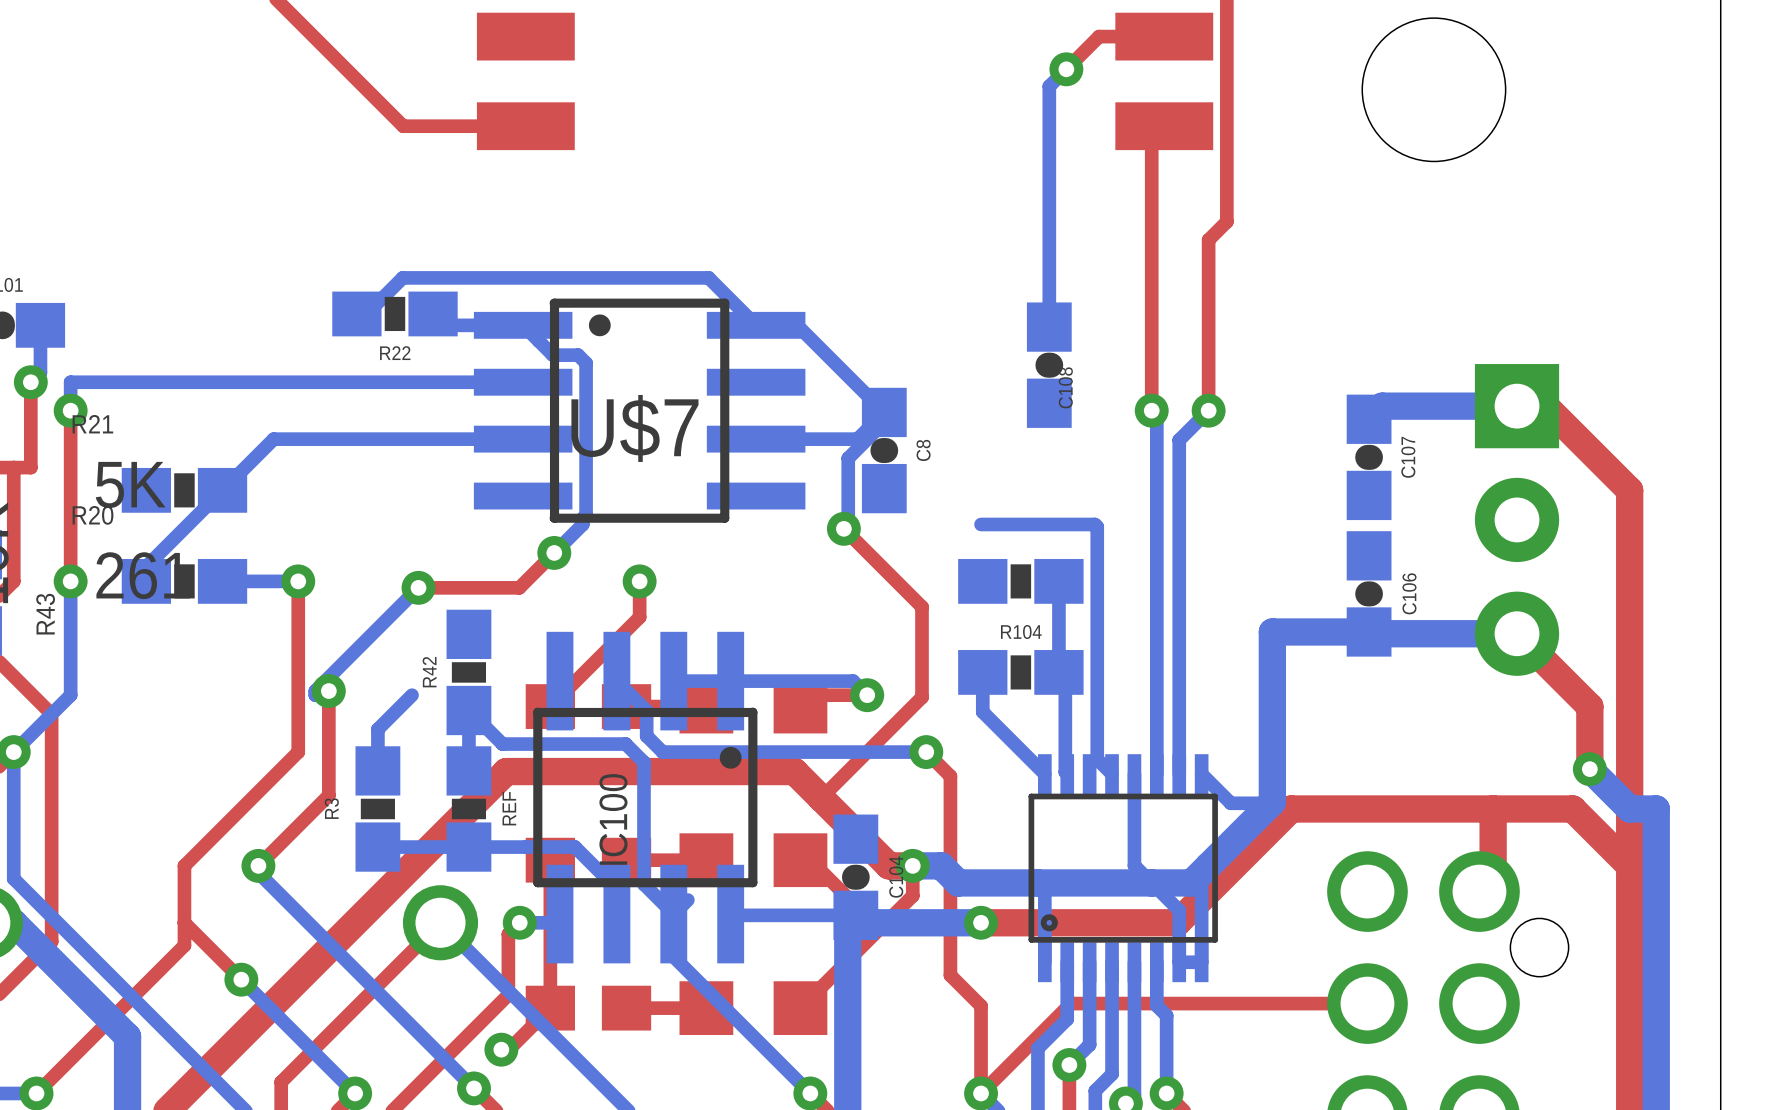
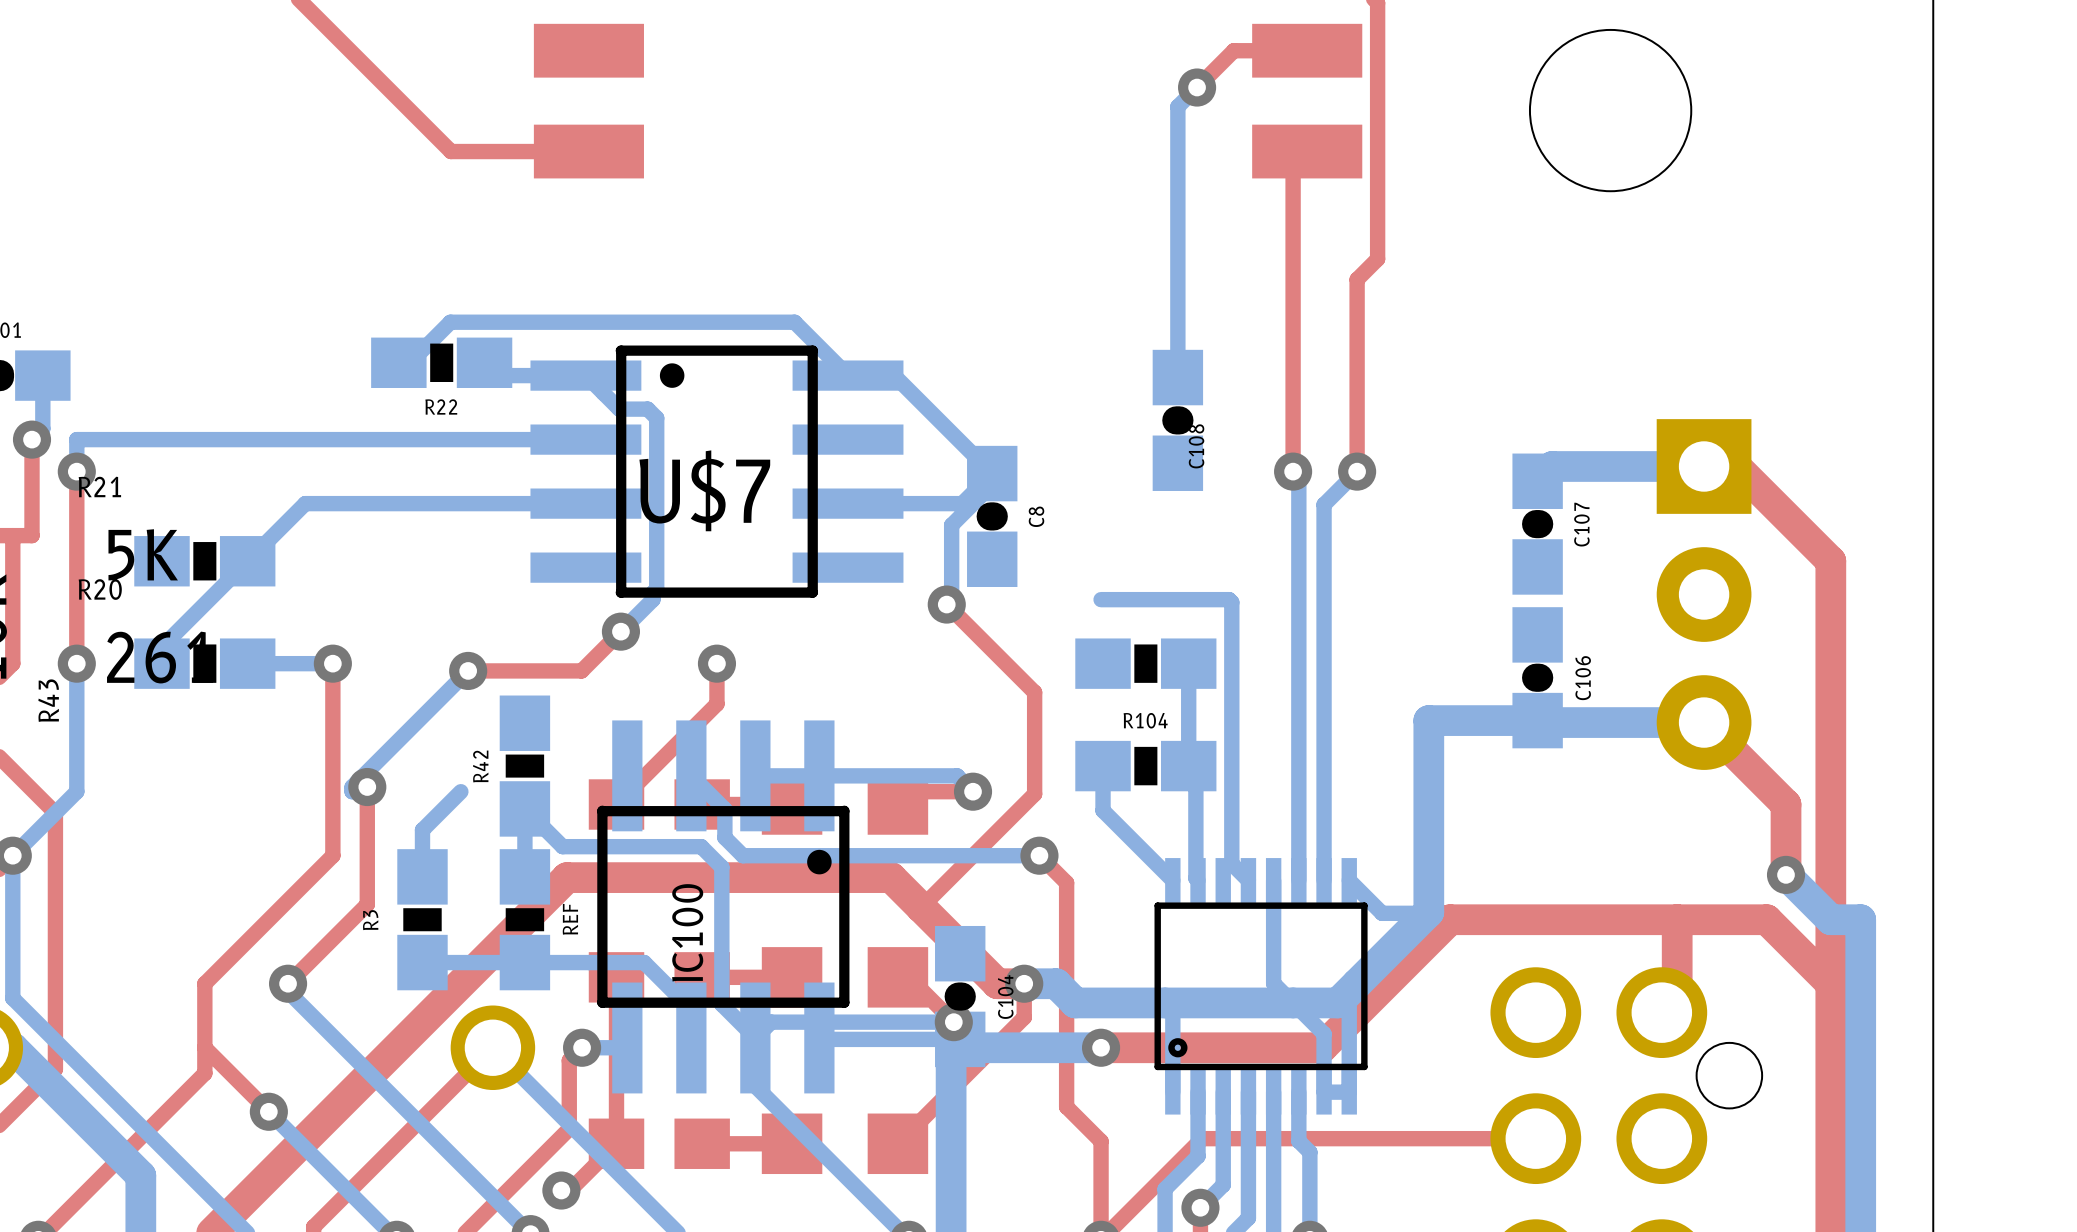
bottom track: none -> (953, 1022) (771, 1022)
via: none -> (953, 1022)

